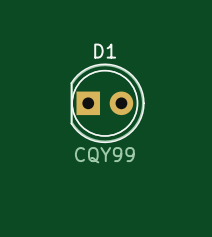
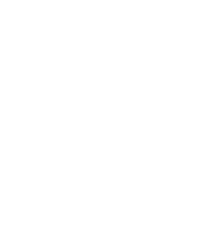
D1: CQY99 (107, 103) -> none

